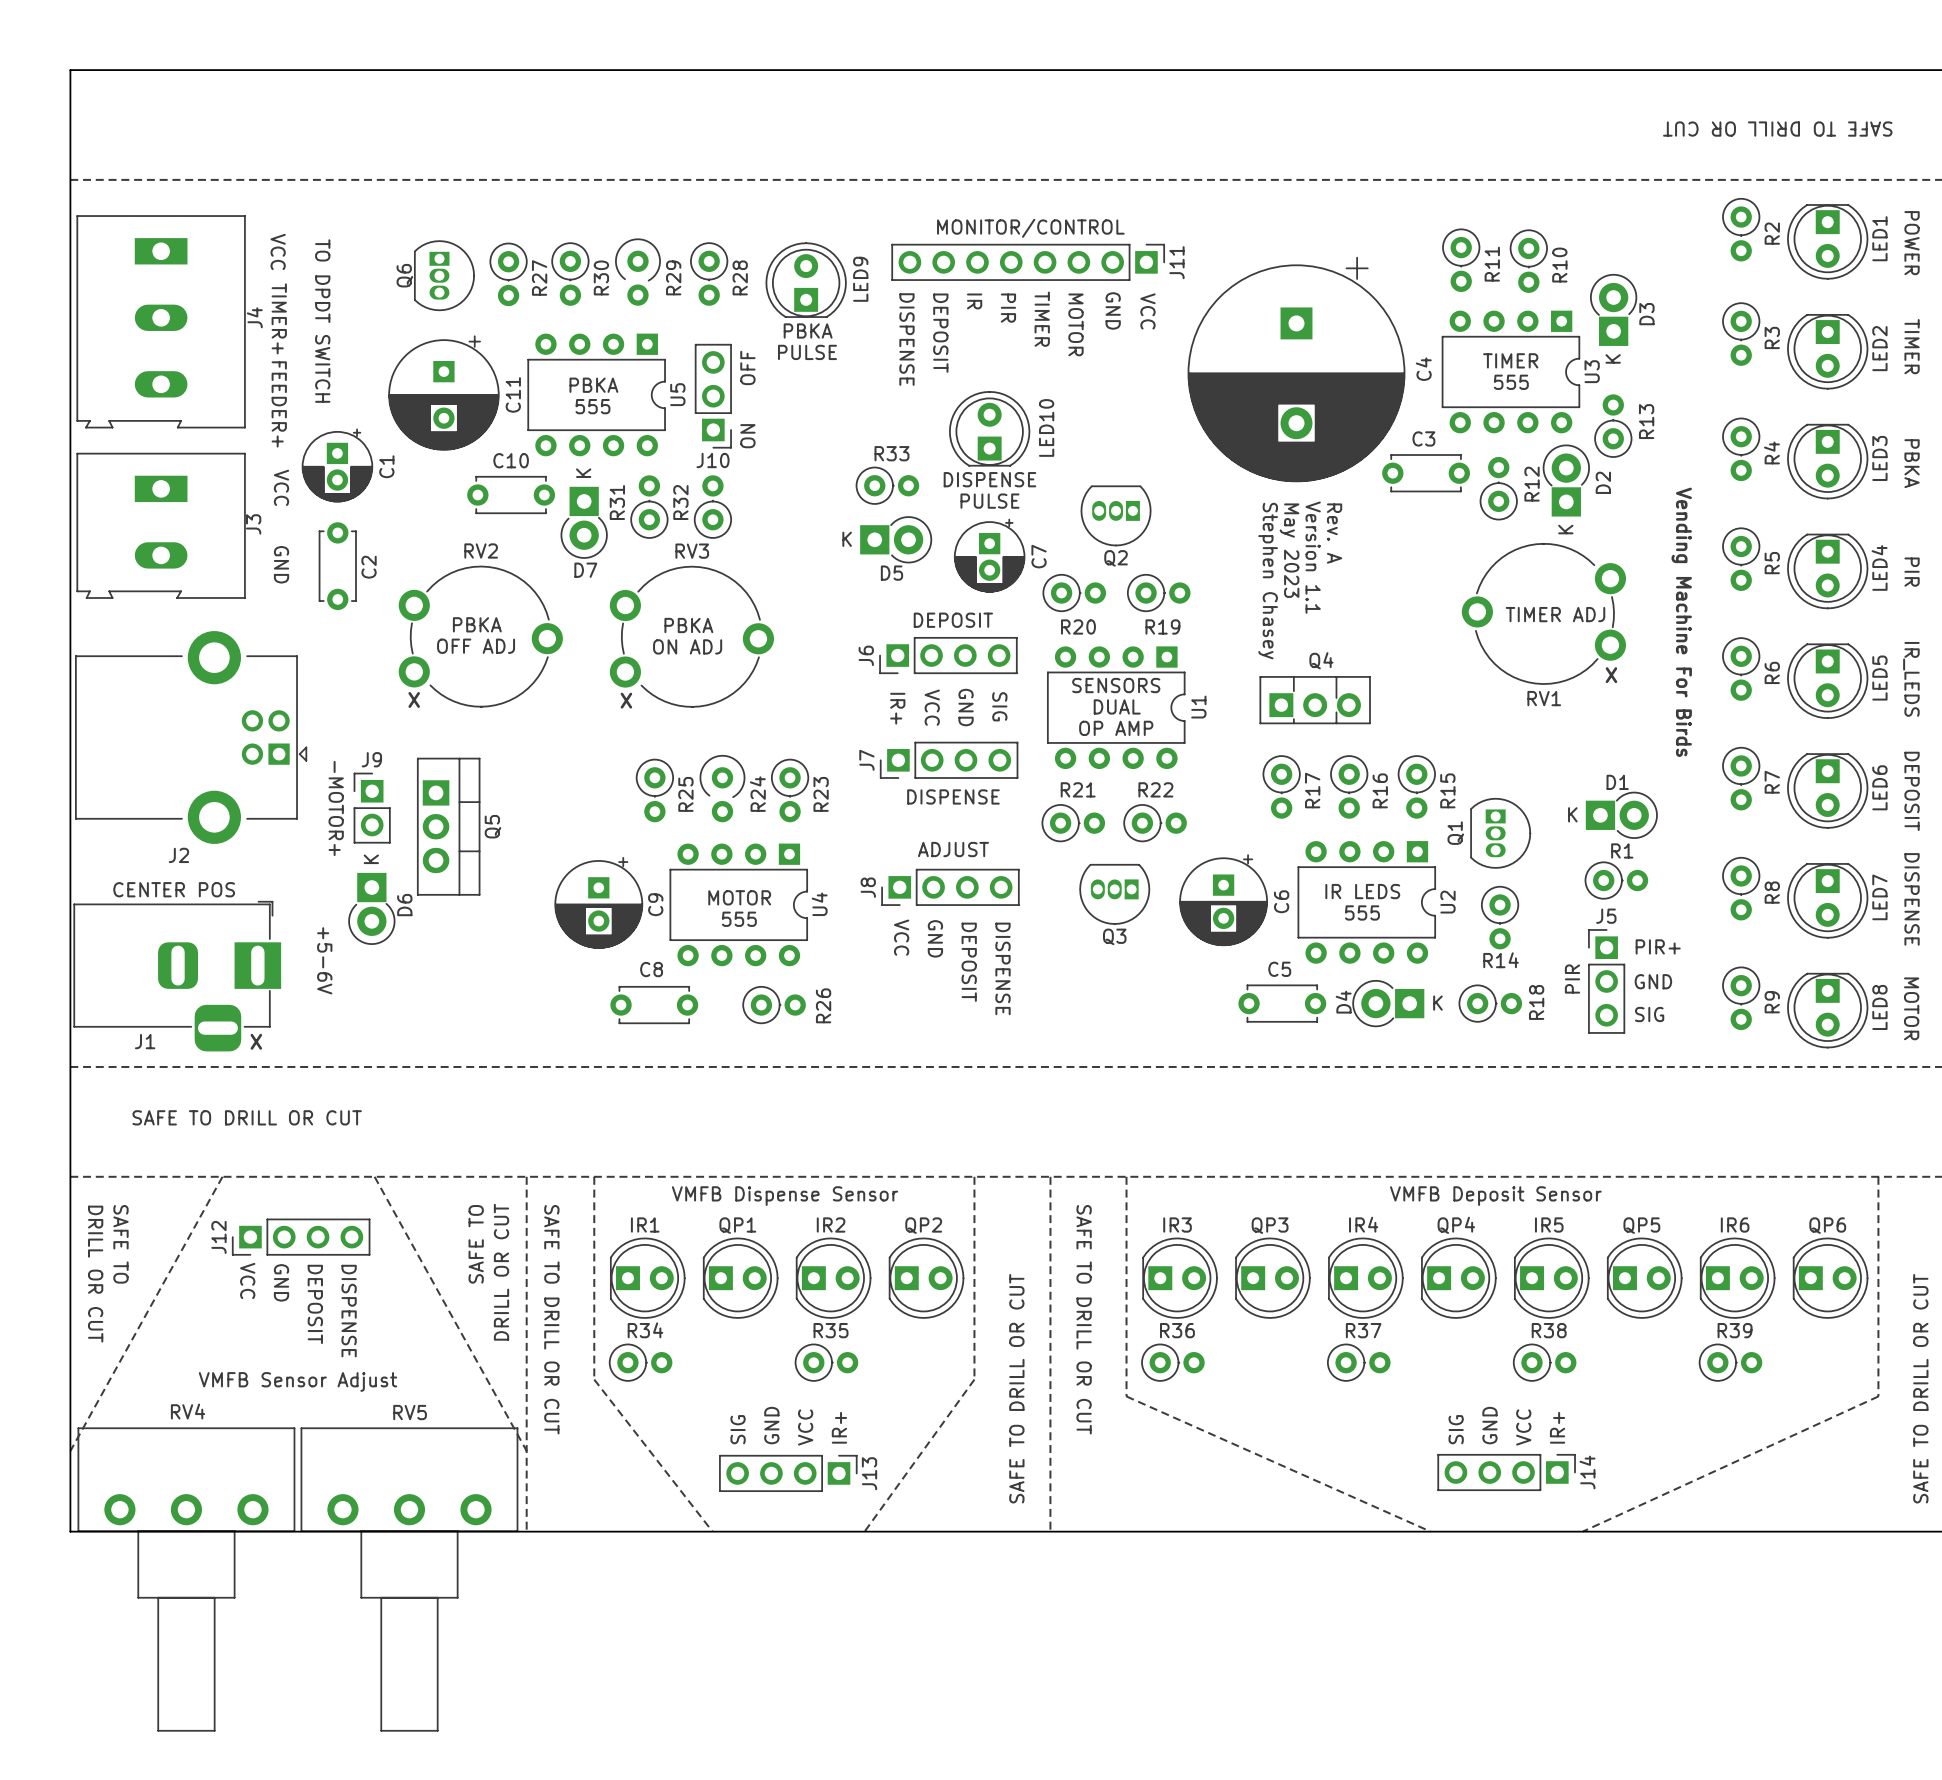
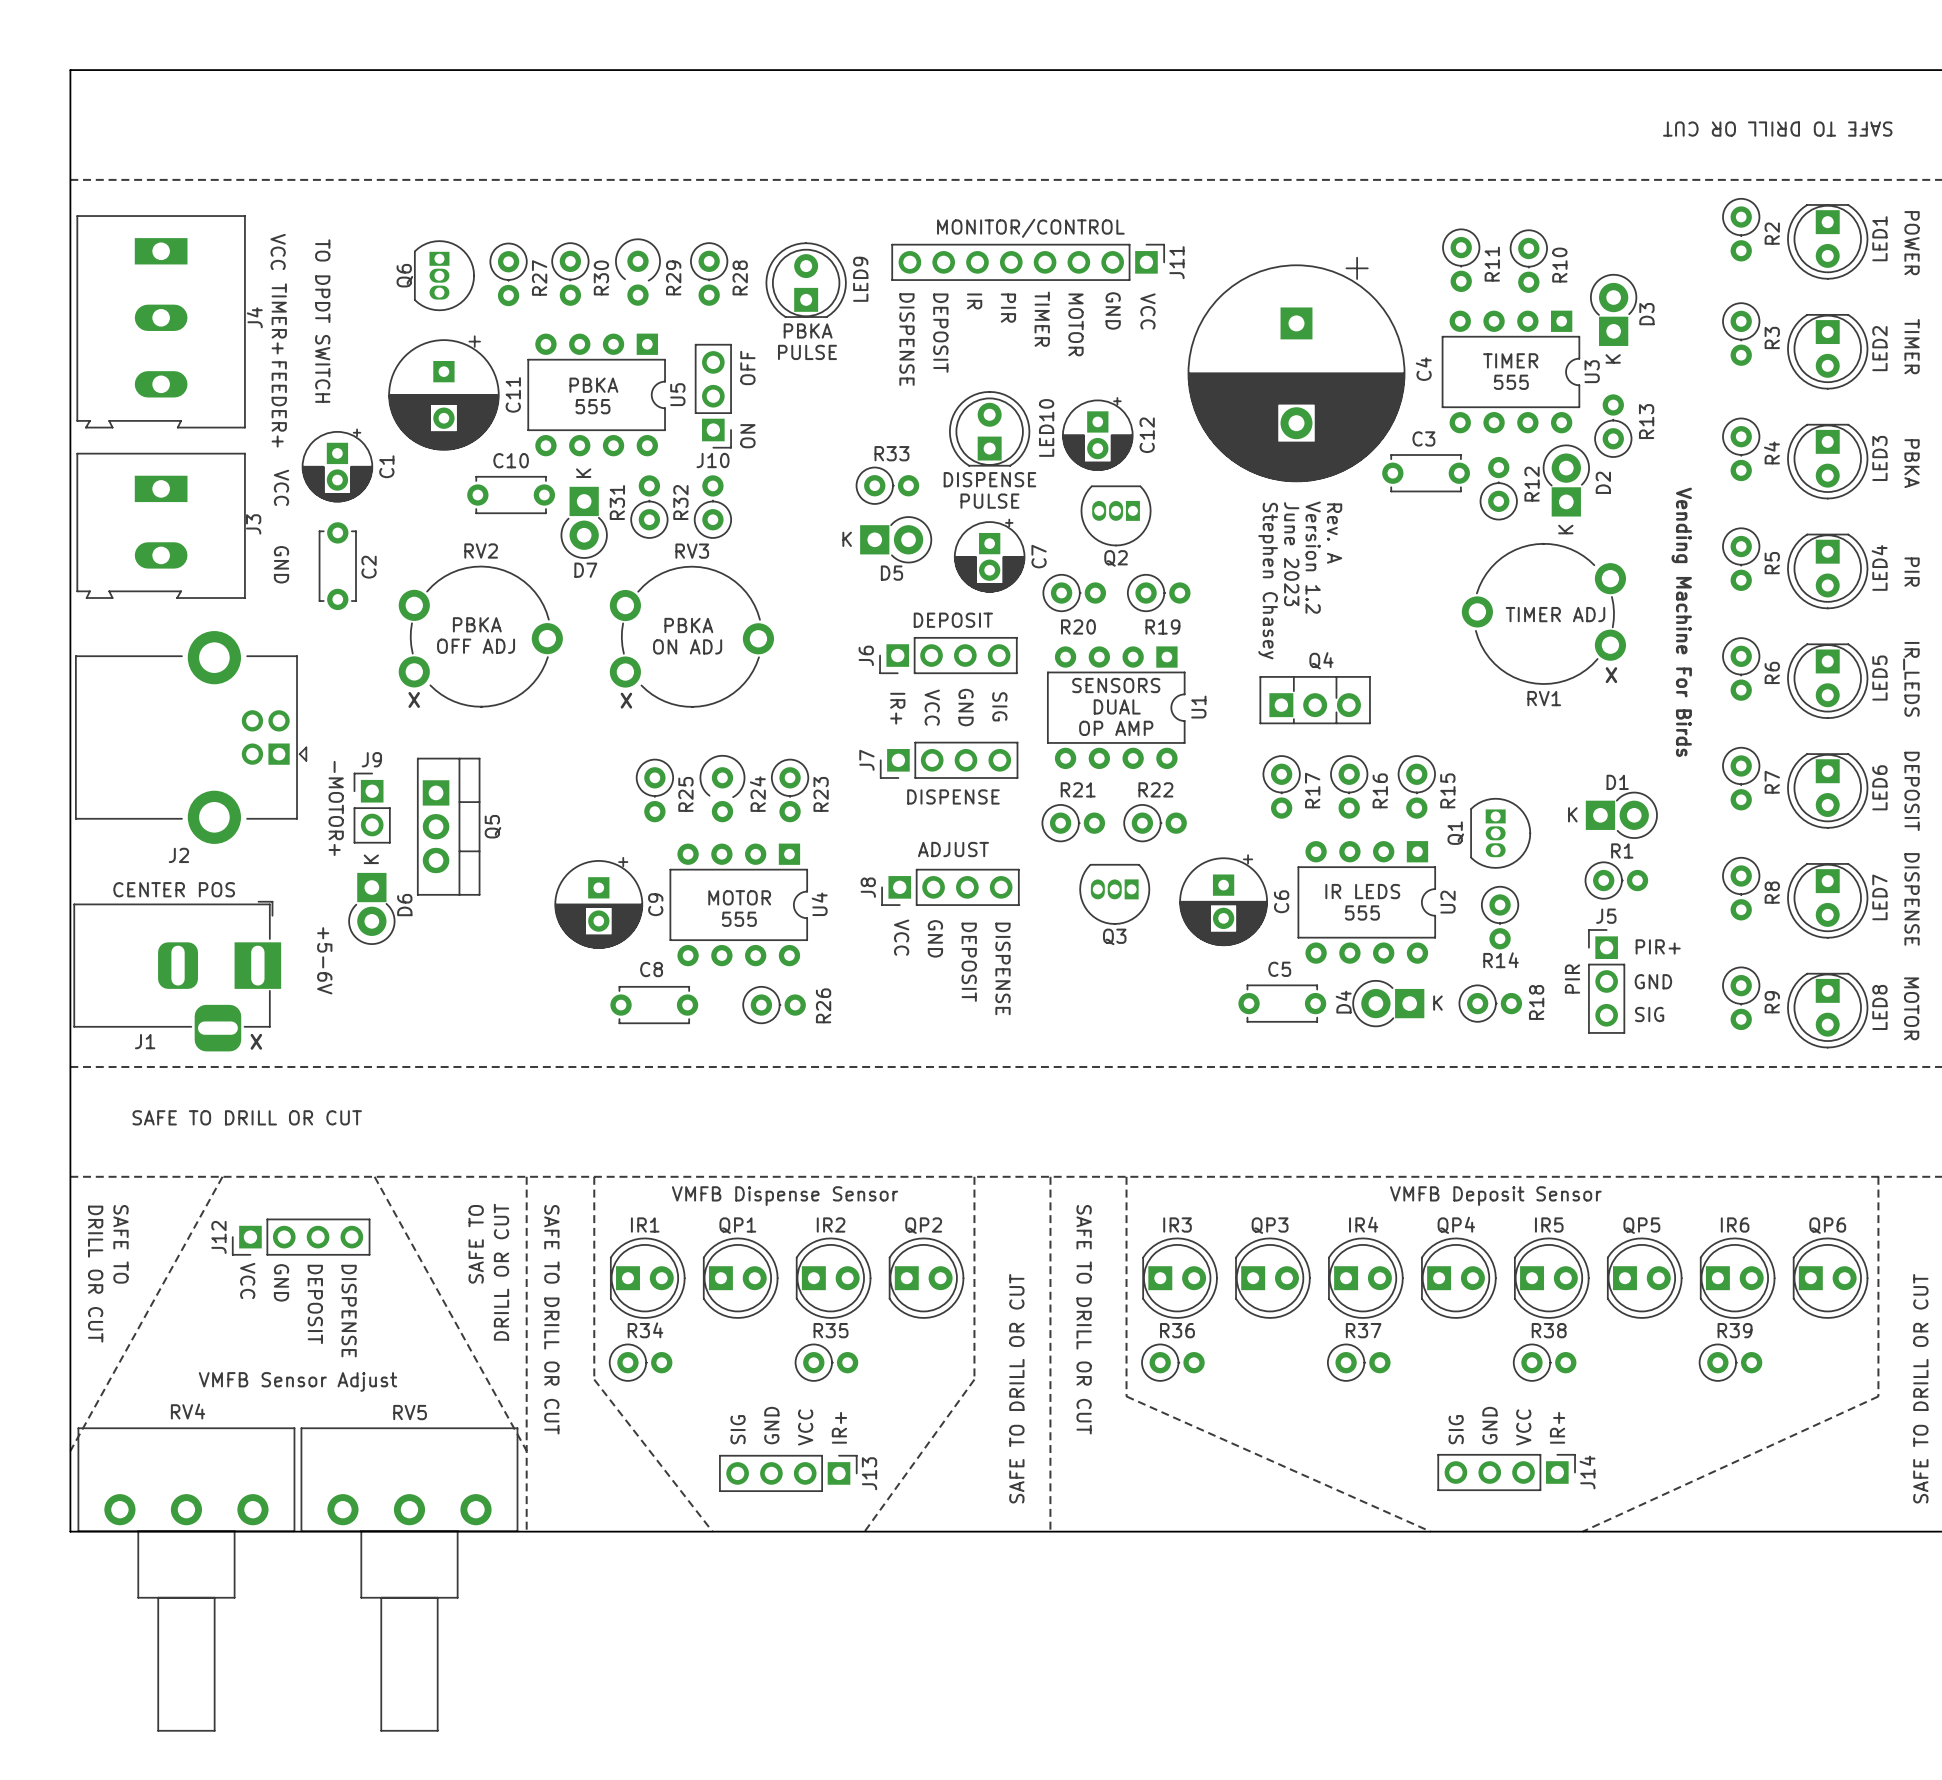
C12: none -> (1097, 434)
text: May 2023 (1289, 550) -> June 2023 (1291, 554)
text: Version 1.1 (1313, 557) -> Version 1.2 (1313, 557)

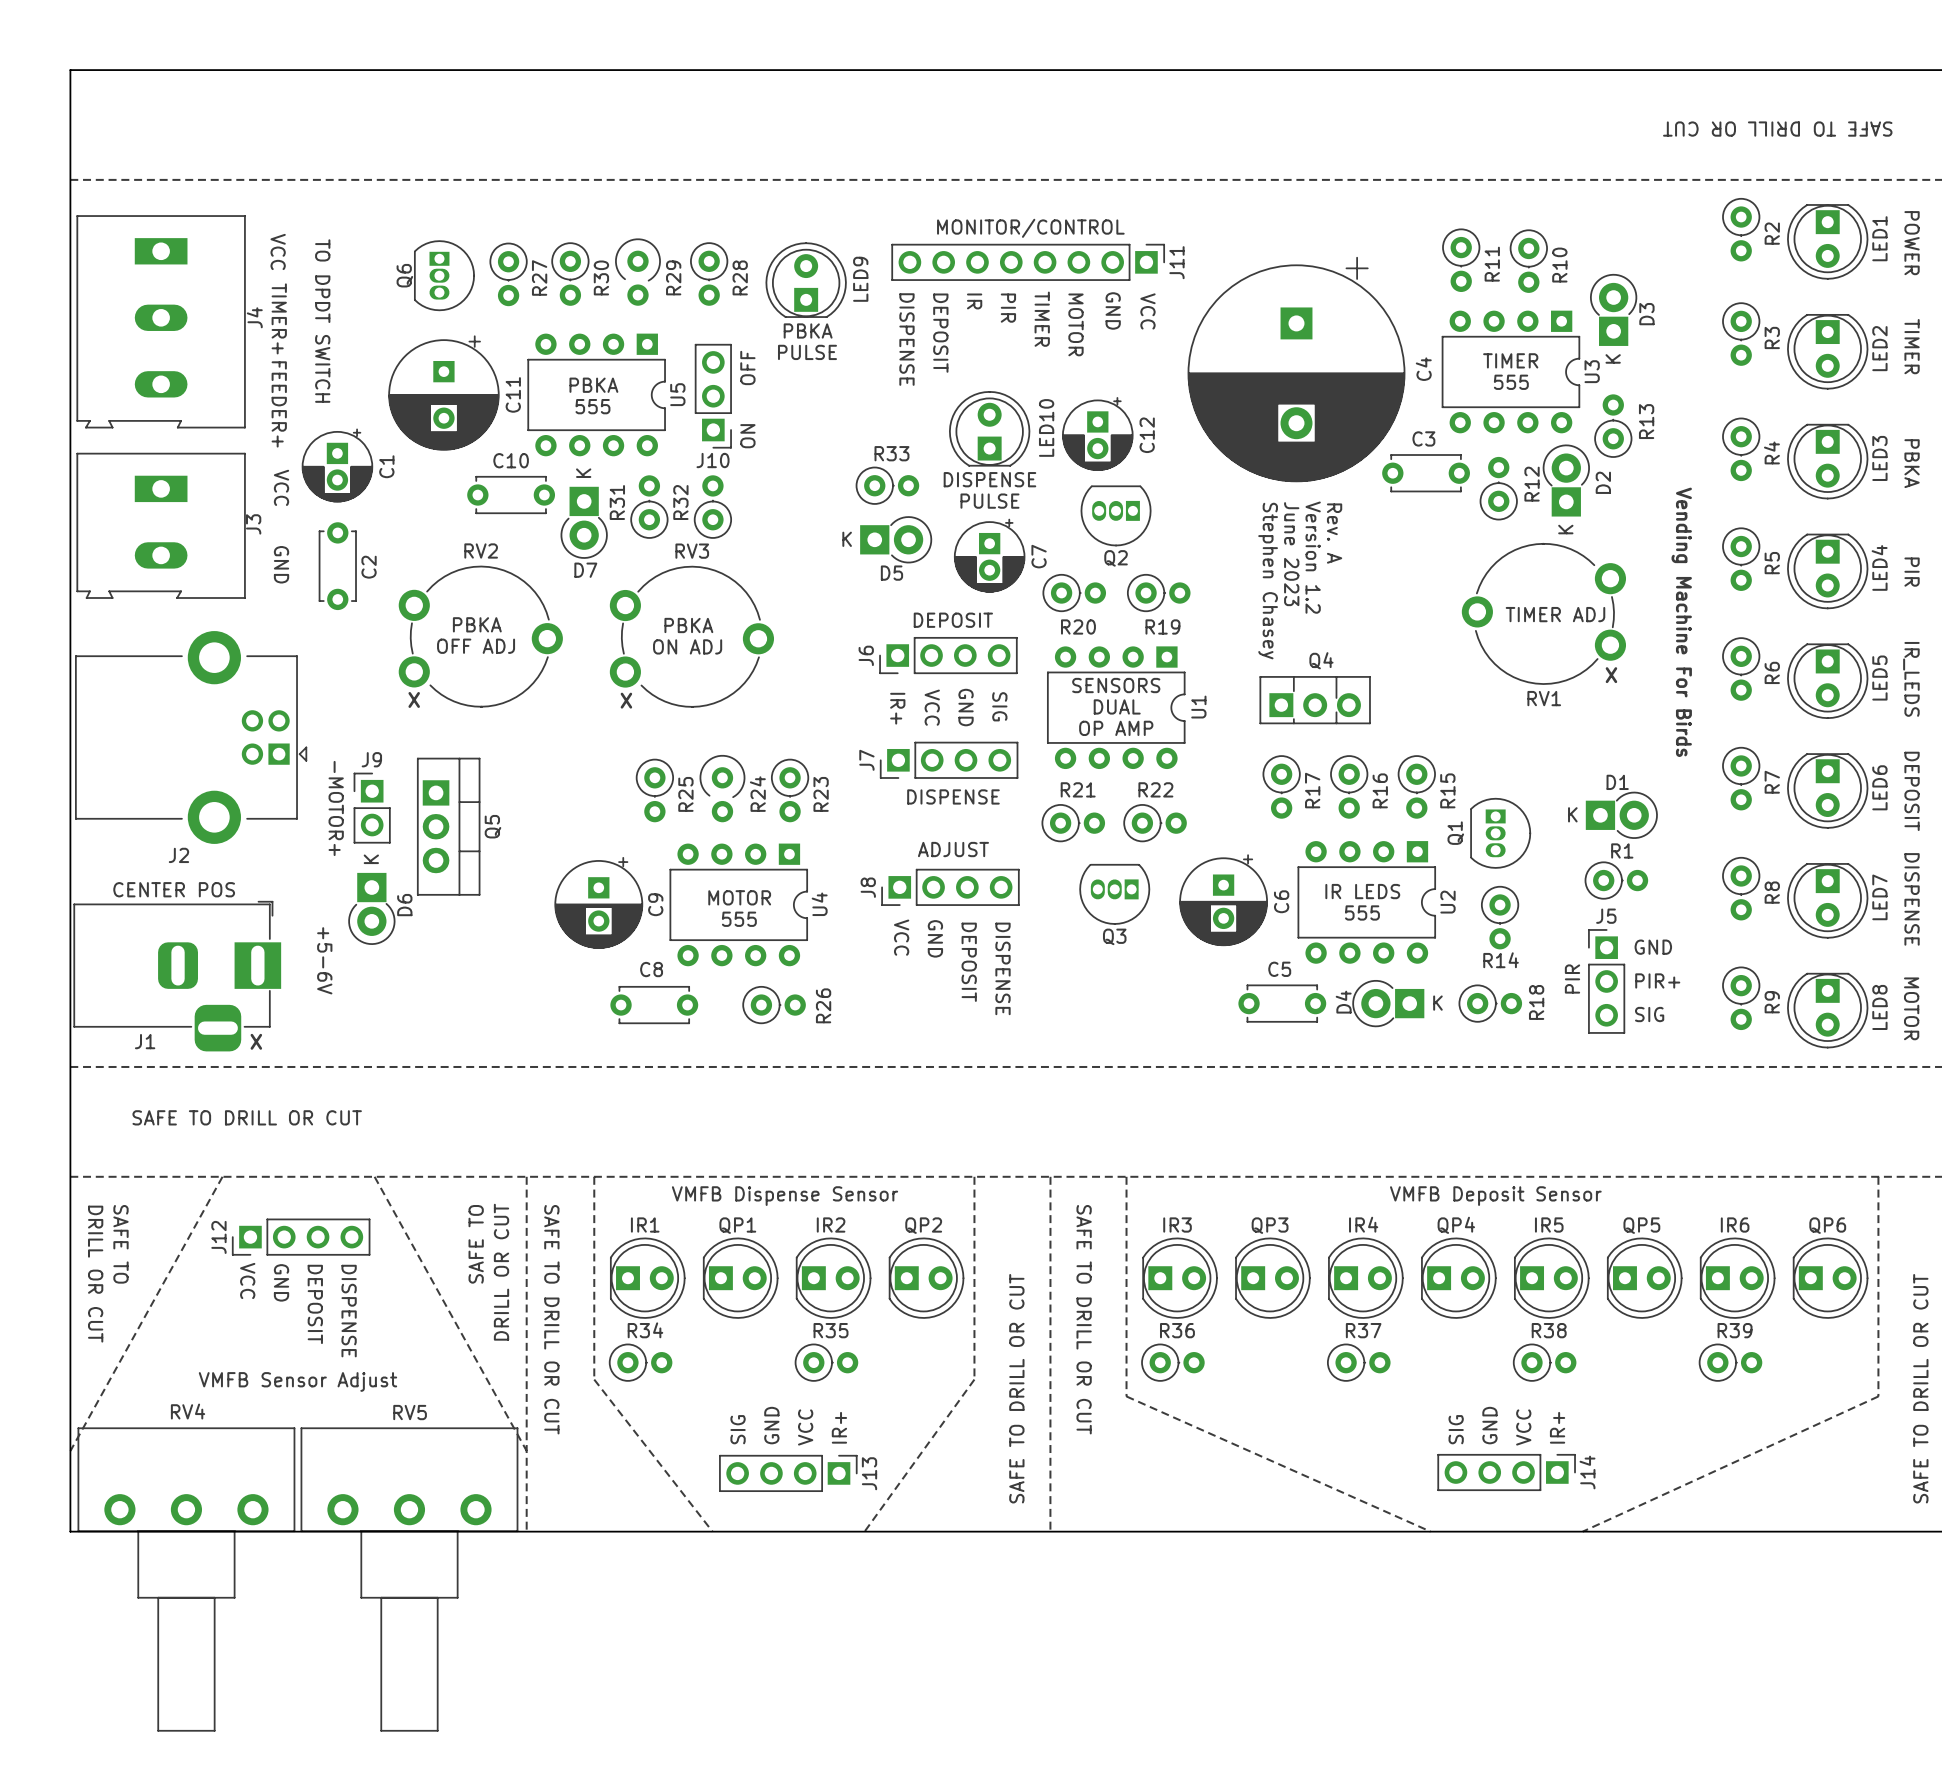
text: PIR+ (1658, 946) -> GND (1653, 947)
text: GND (1653, 981) -> PIR+ (1657, 980)

